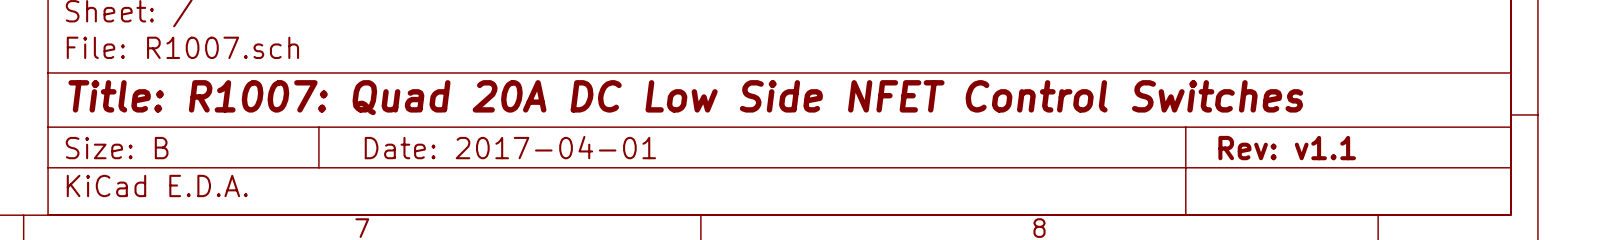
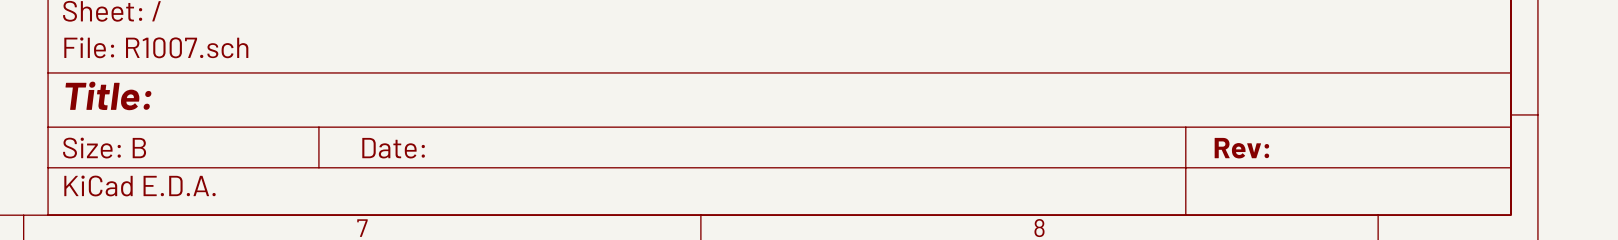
title block: Title: R1007: Quad 20A DC Low Side NFET Control Switches (685, 97) -> Title: (108, 95)
title block: Date: 2017-04-01 (510, 147) -> Date: (393, 148)
title block: Rev: v1.1 (1287, 148) -> Rev: (1241, 148)

